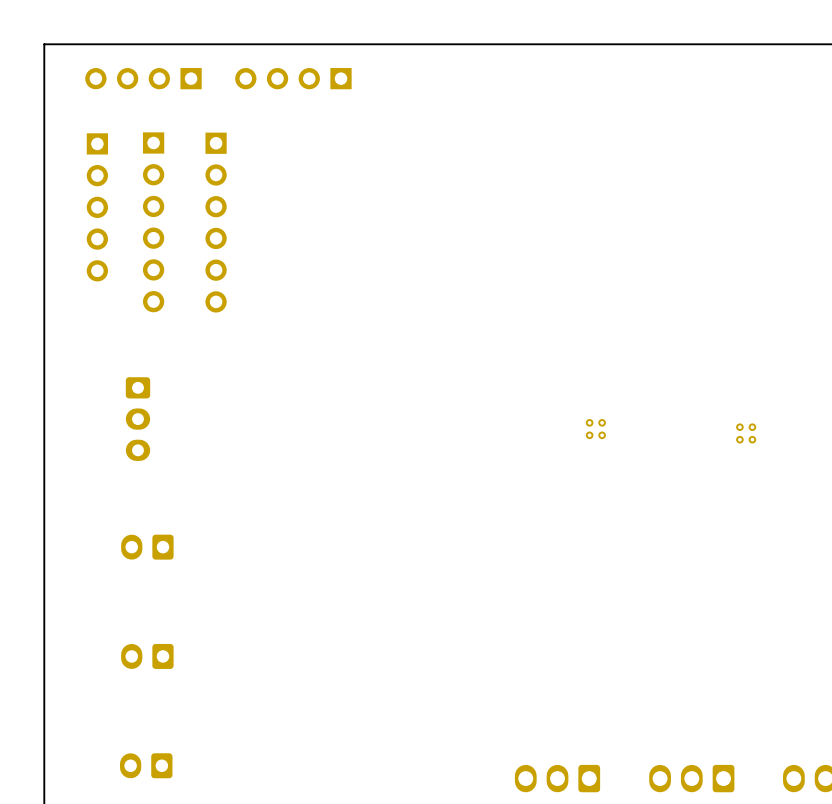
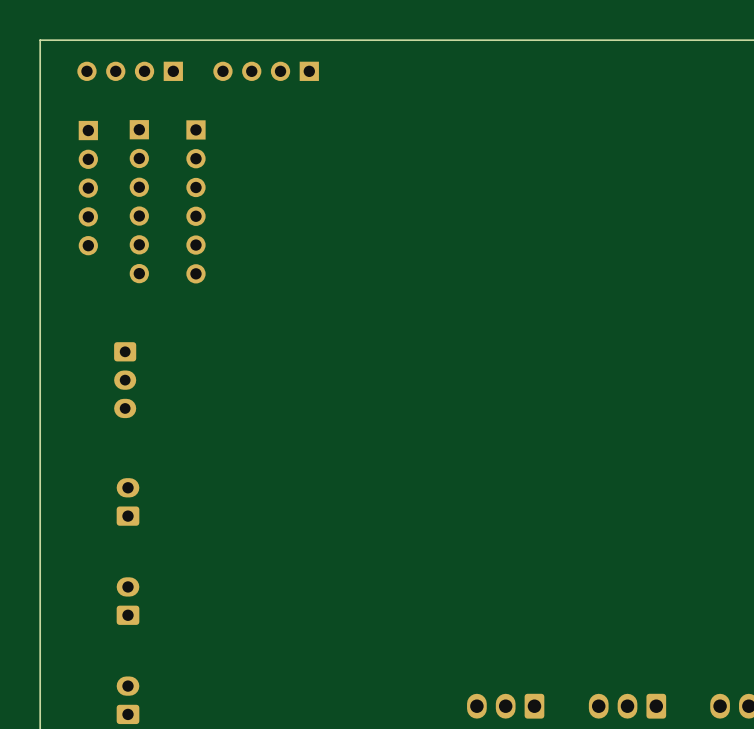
part: (595, 429) -> none
part: (746, 433) -> none
part rotation: 0° (147, 547) -> 90° clockwise (127, 501)
part rotation: 0° (147, 656) -> 90° clockwise (127, 601)
part rotation: 0° (146, 765) -> 90° clockwise (127, 700)

